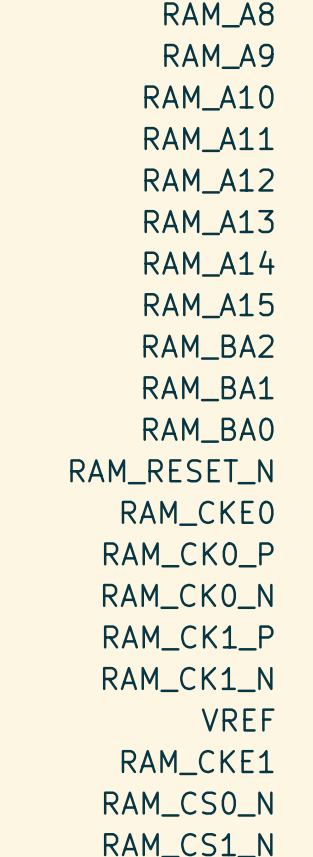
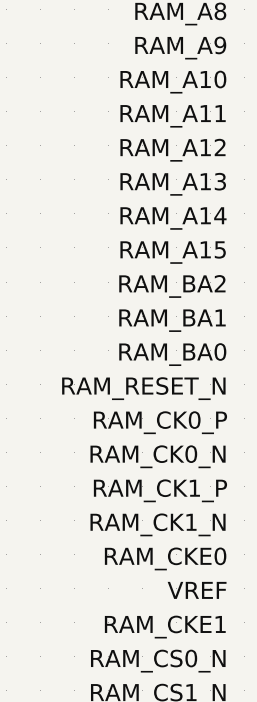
label: RAM_CKE0 (197, 513) -> RAM_CK0_P (160, 422)
label: RAM_CK0_P (188, 554) -> RAM_CK0_N (158, 456)
label: RAM_CK0_N (187, 596) -> RAM_CK1_P (160, 490)
label: RAM_CK1_P (188, 637) -> RAM_CK1_N (158, 524)
label: RAM_CK1_N (187, 679) -> RAM_CKE0 (165, 558)

